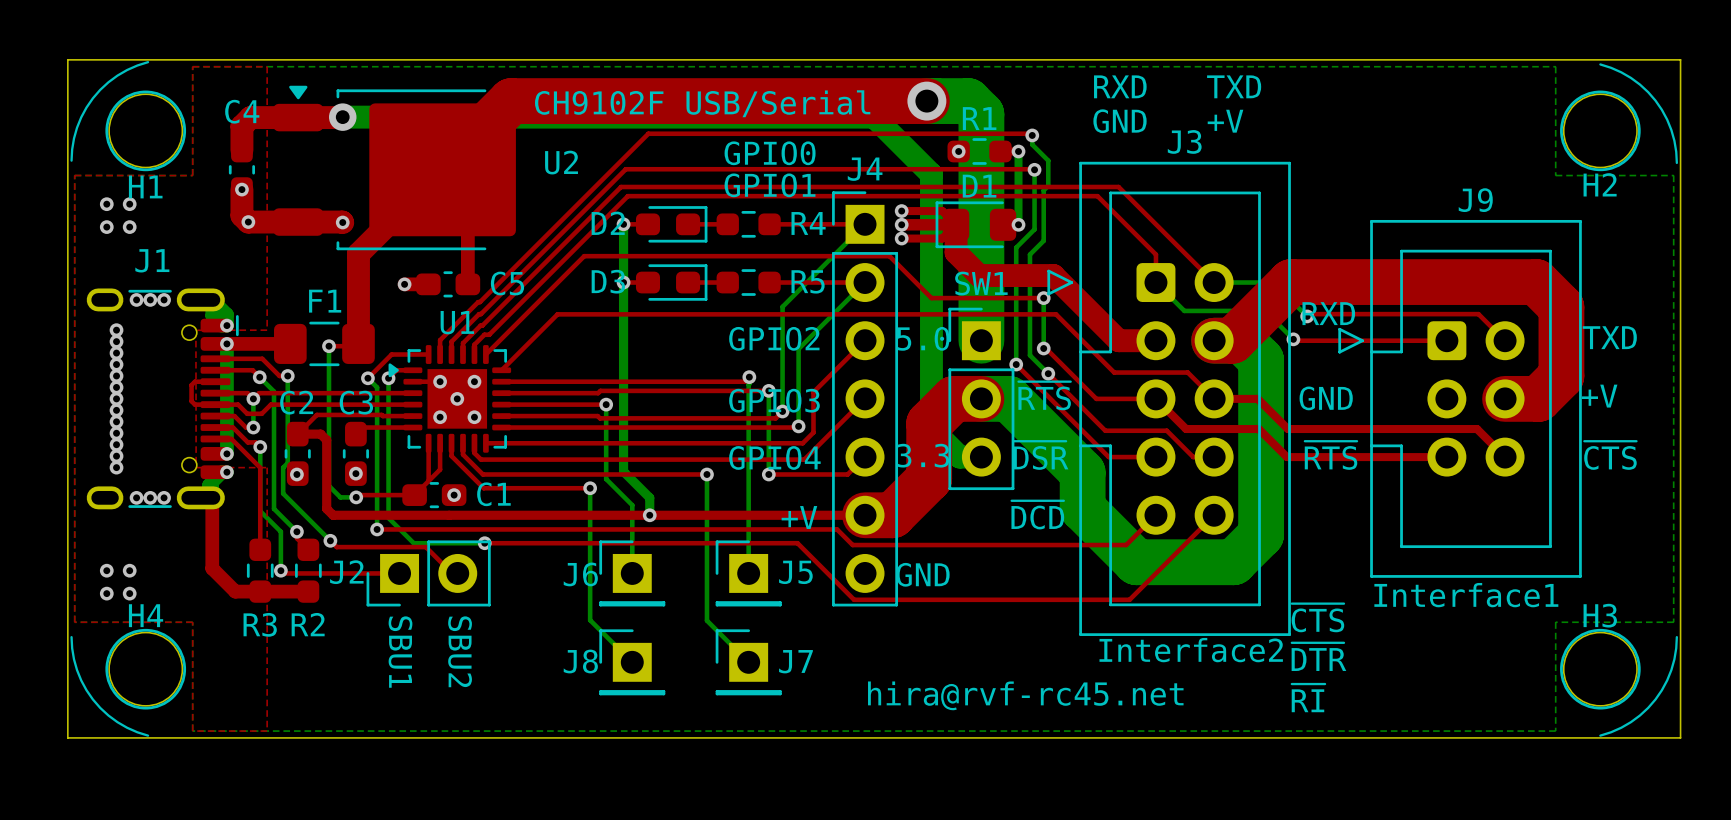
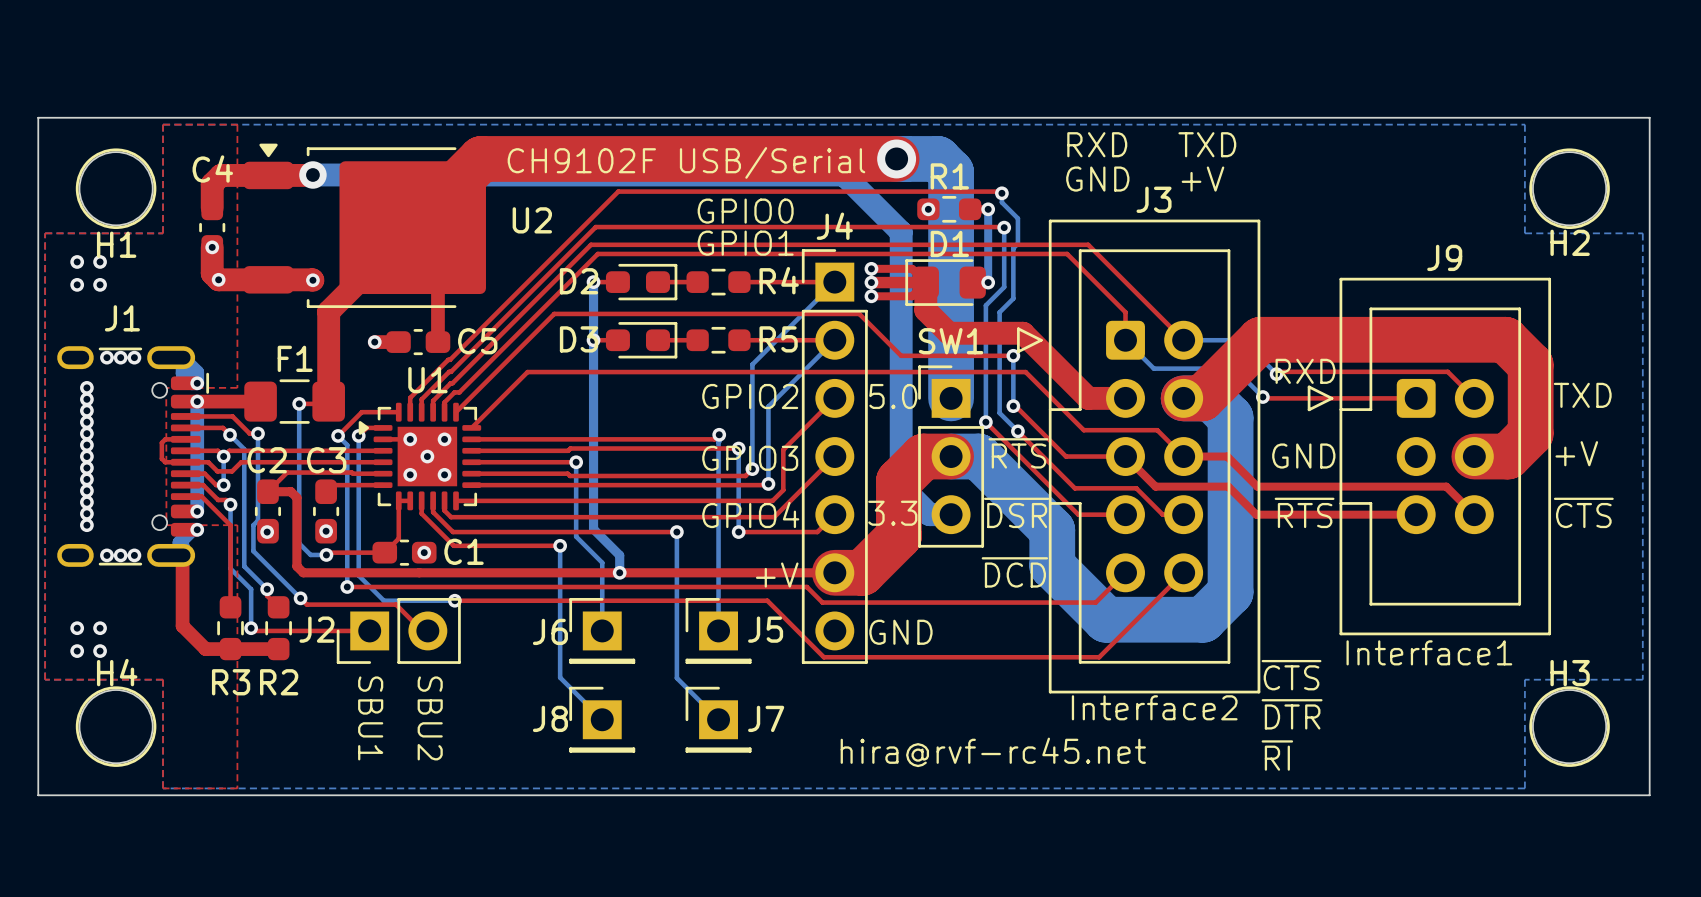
line: (148, 62) (117, 75) (92, 98) (77, 127) (71, 160) -> none
line: (1600, 64) (1630, 77) (1655, 100) (1671, 129) (1676, 162) -> none
top track: (440, 443) (440, 469) (428, 481) -> (410, 500) (398, 500)
line: (71, 637) (77, 670) (92, 699) (117, 722) (148, 735) -> none
line: (1676, 637) (1671, 670) (1655, 699) (1630, 722) (1600, 735) -> none

